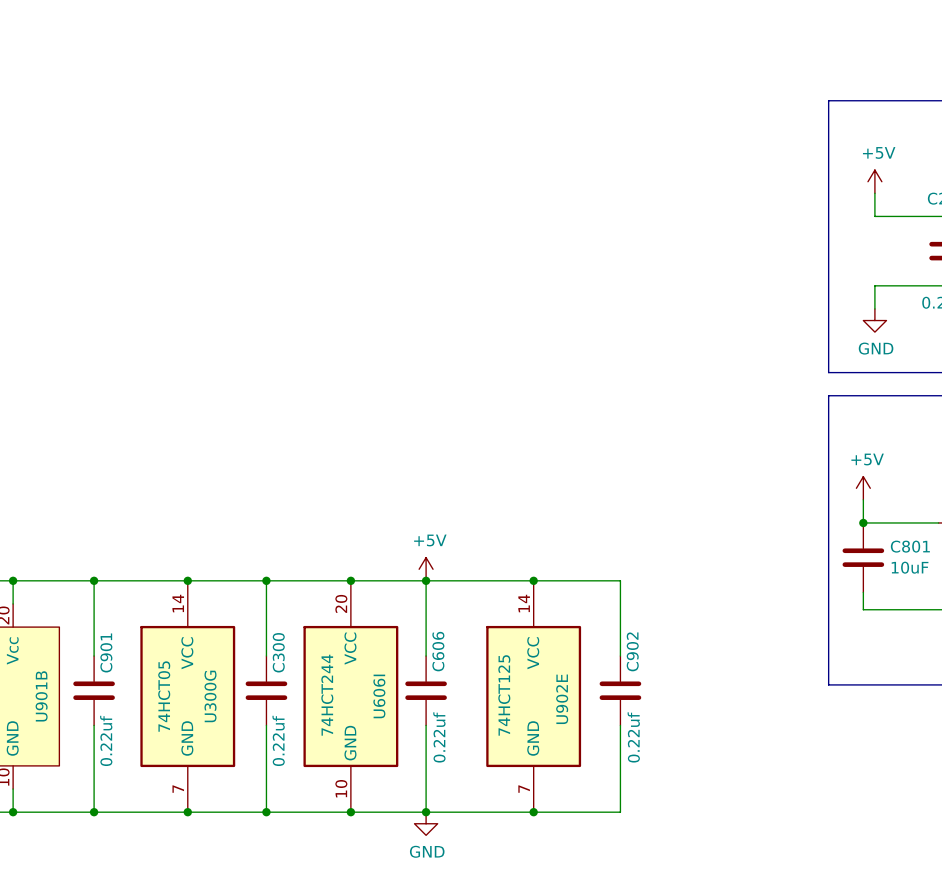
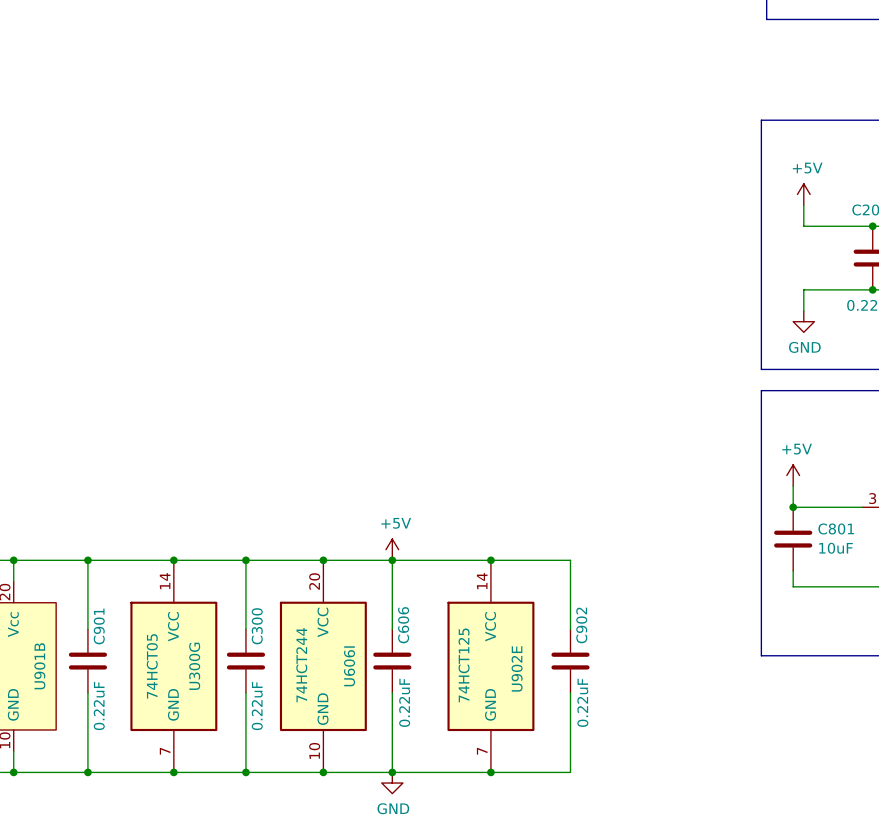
C606 value: 0.22uf (439, 737) -> 0.22uF (404, 702)
C902 value: 0.22uf (633, 737) -> 0.22uF (582, 702)
C901 value: 0.22uf (106, 740) -> 0.22uF (99, 706)
C300 value: 0.22uf (278, 740) -> 0.22uF (257, 706)

